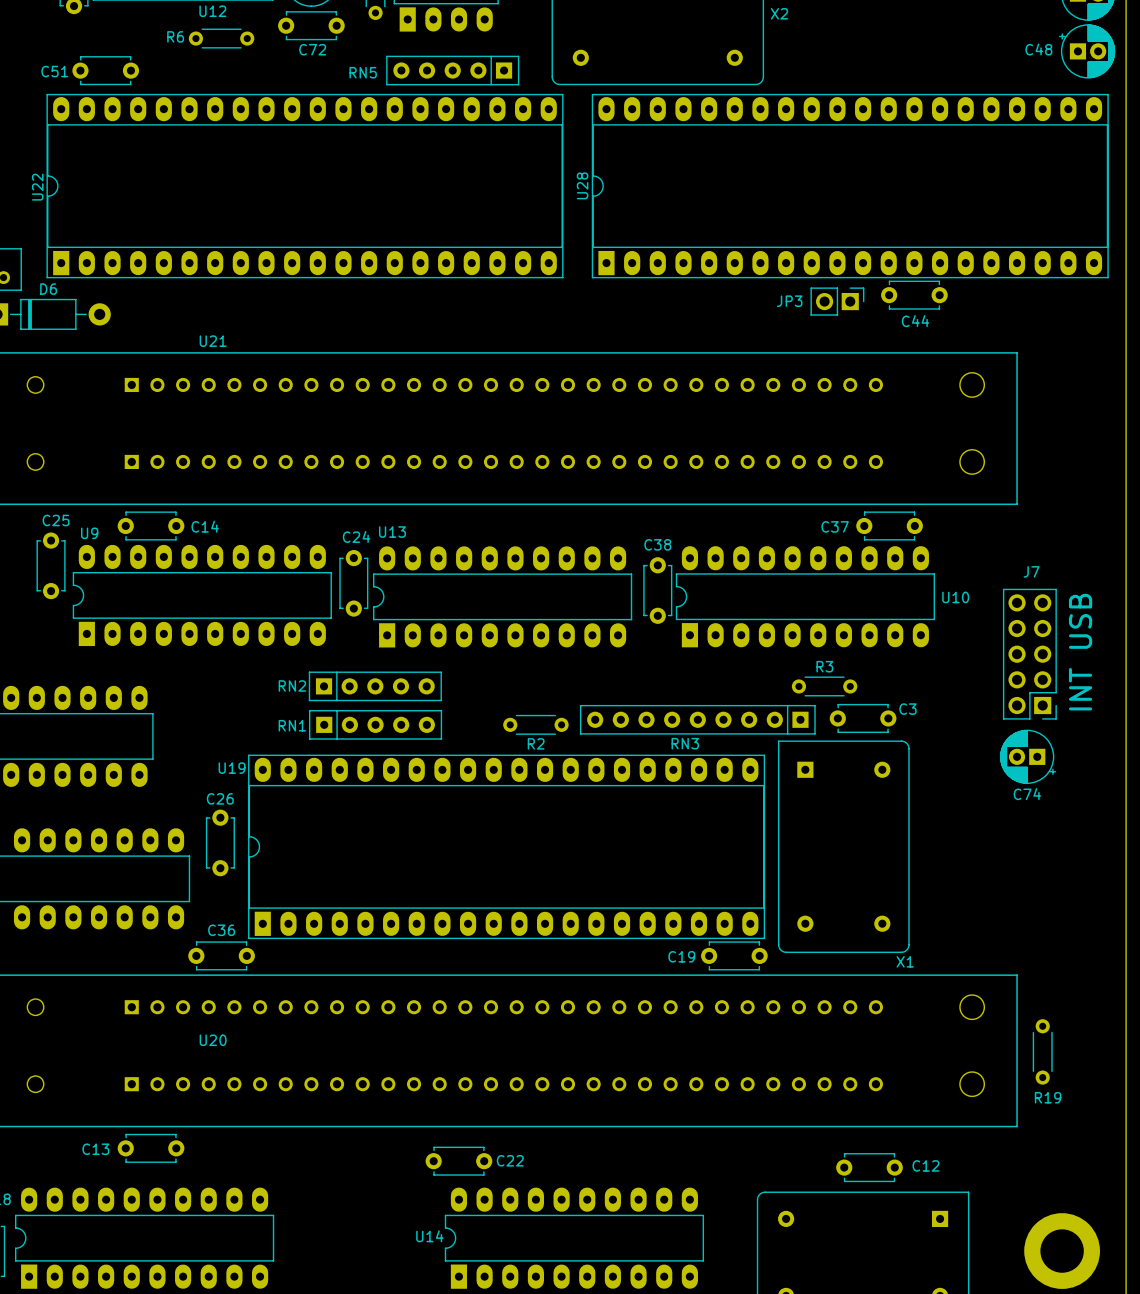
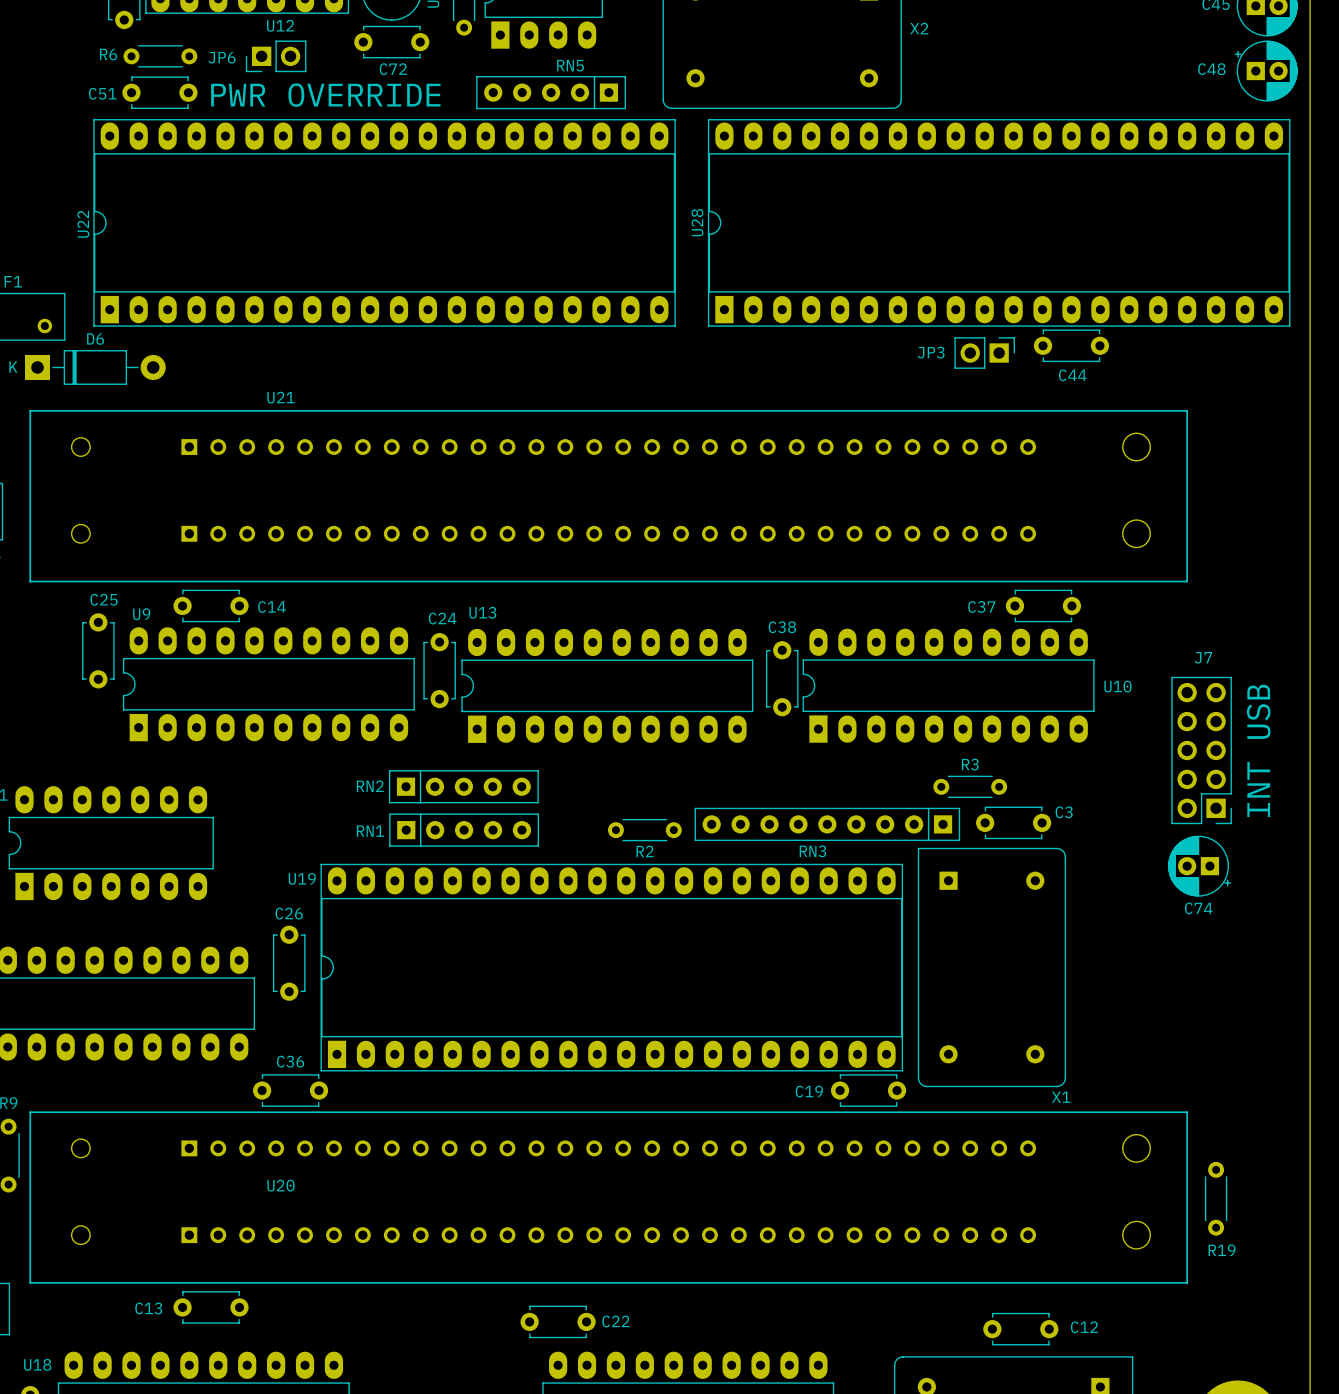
JP6: none -> (276, 56)
R6 position: (221, 38) -> (160, 56)
text: none -> PWR OVERRIDE (325, 95)
RN5 name position: RN5 (363, 72) -> RN5 (570, 65)

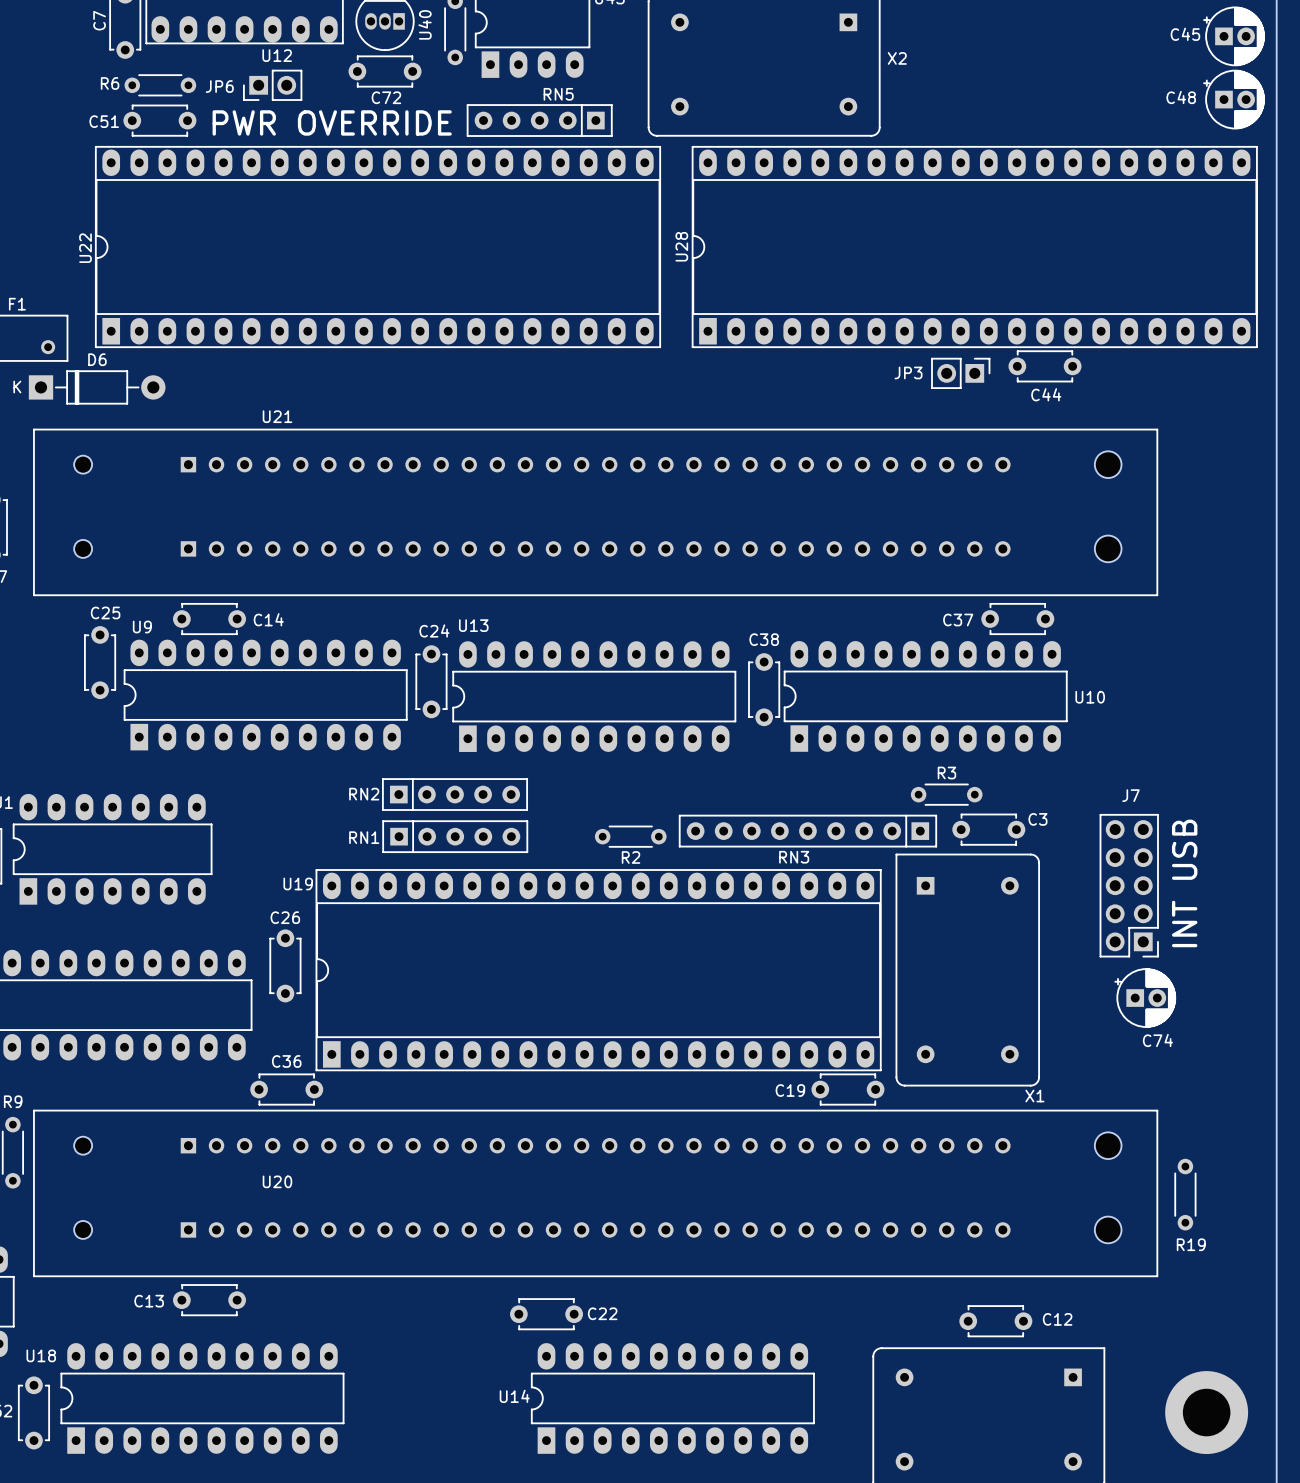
J7 position: (1201, 750) -> (1129, 885)
text position: INT USB (1258, 750) -> INT USB (1184, 883)
C74 rotation: 0° (1199, 866) -> 180° (1145, 998)
C74 position: (1199, 866) -> (1145, 998)

